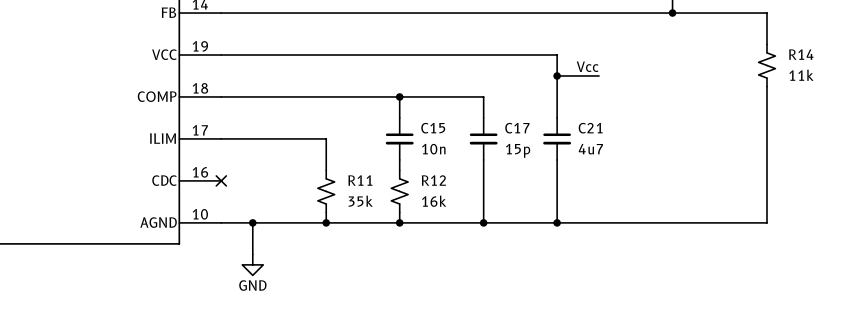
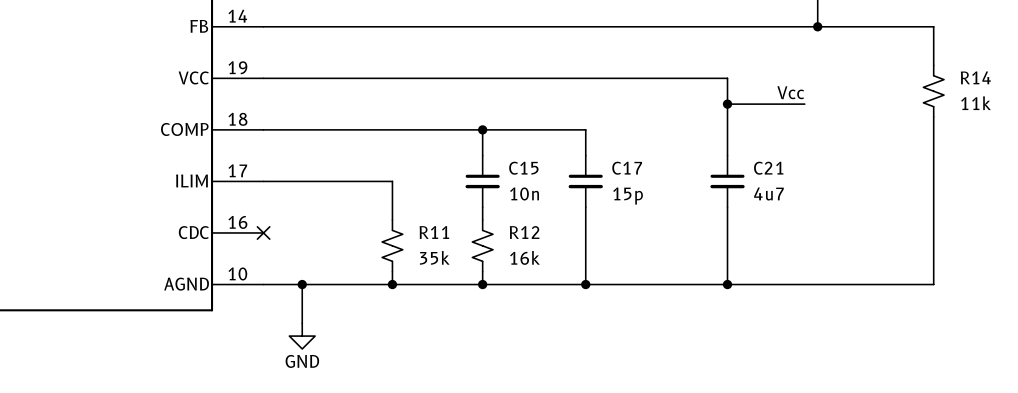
wire: (557, 55) (557, 117) -> (675, 78) (727, 78) (727, 155)
label position: Vcc (587, 66) -> Vcc (790, 92)
wire: (557, 75) (599, 75) -> (804, 104) (727, 104)
junction position: (557, 75) -> (727, 104)
C21 position: (557, 138) -> (727, 181)
wire: (557, 159) (557, 222) -> (727, 207) (727, 284)
junction position: (557, 222) -> (727, 284)

